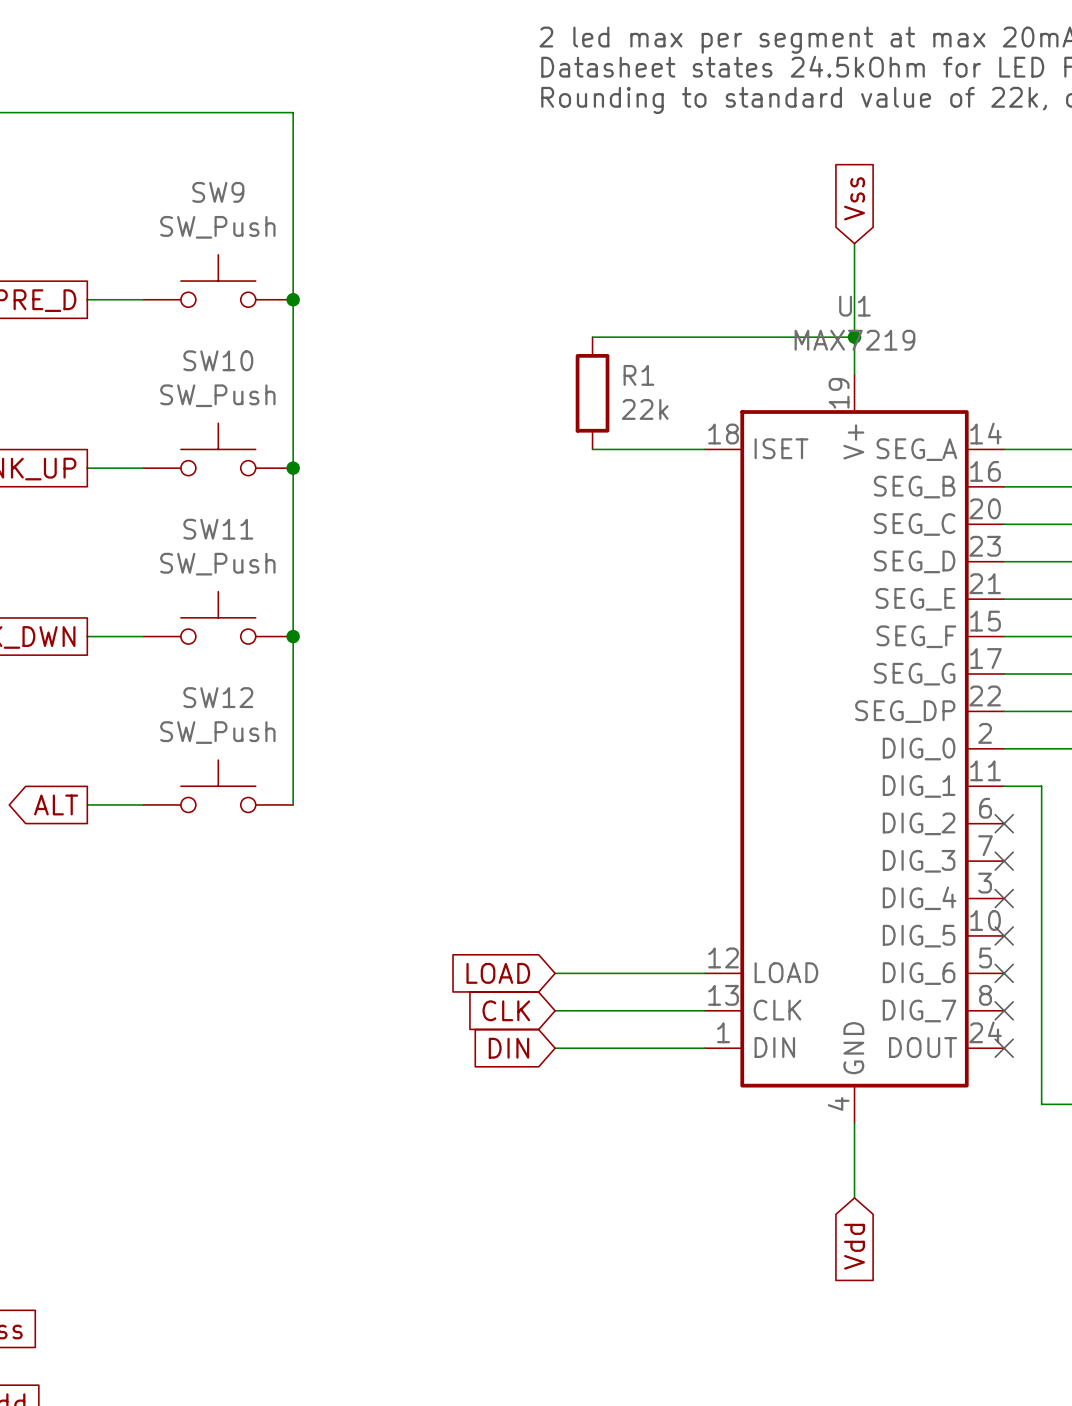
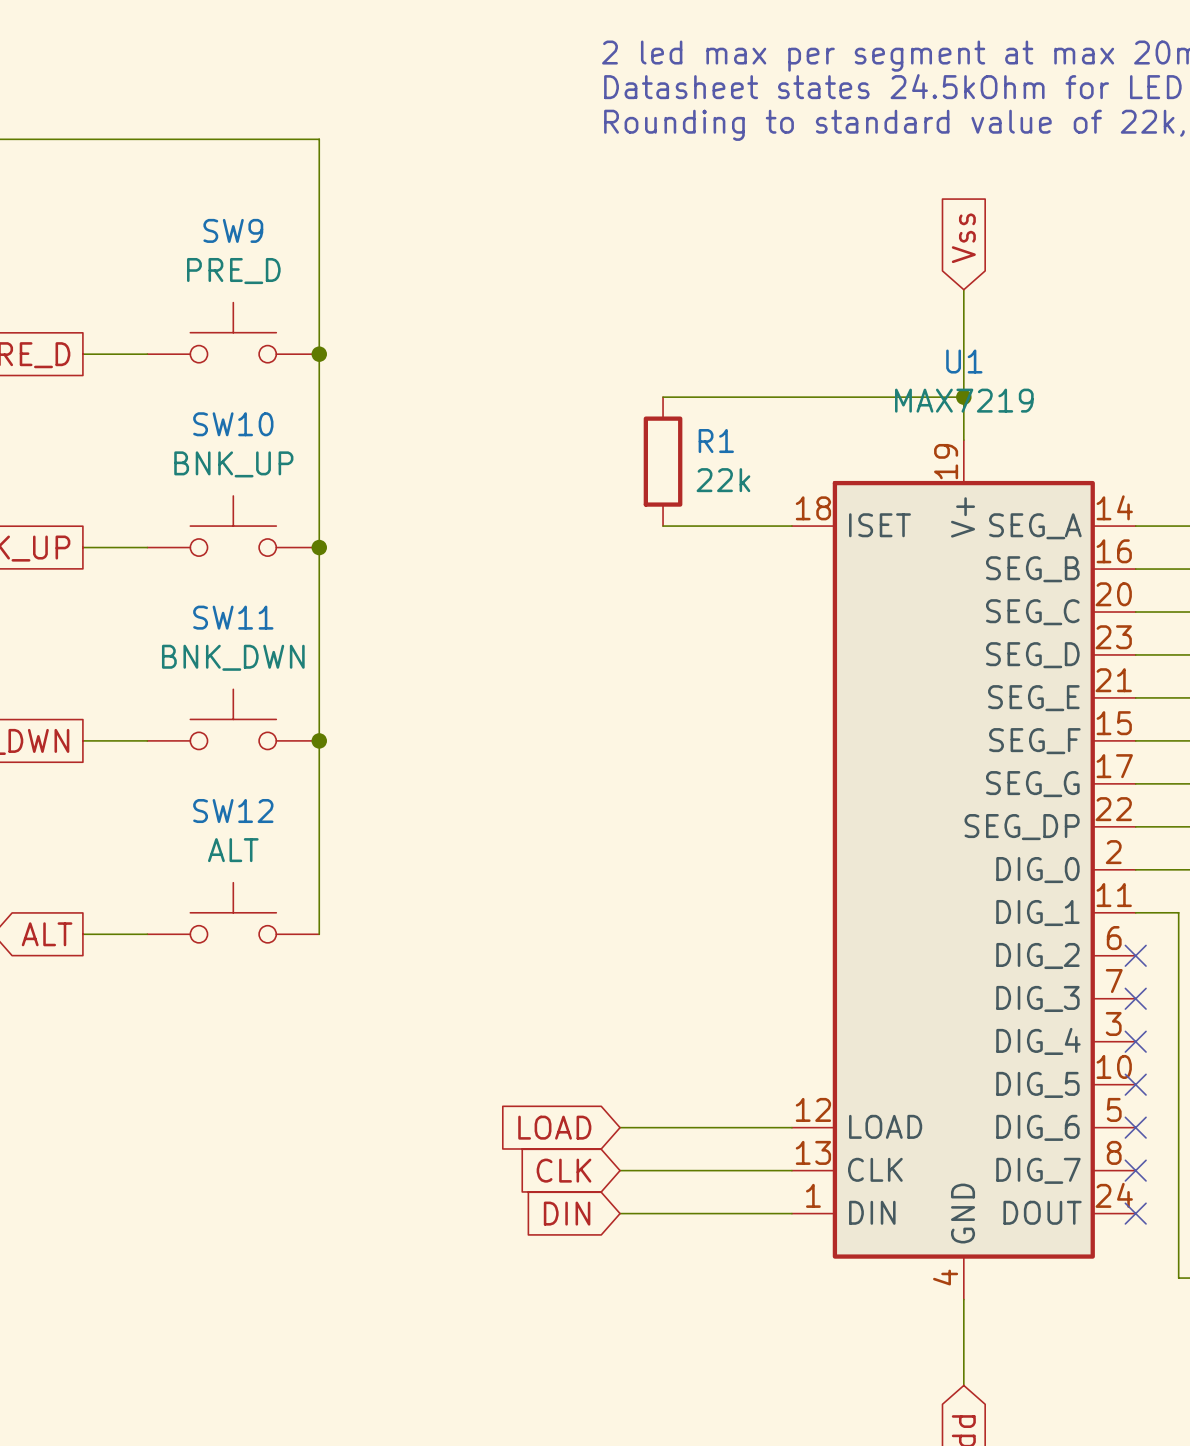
SW9 value: SW_Push (217, 227) -> PRE_D (233, 271)
SW10 value: SW_Push (217, 395) -> BNK_UP (233, 464)
SW11 value: SW_Push (217, 564) -> BNK_DWN (233, 657)
SW12 value: SW_Push (217, 732) -> ALT (233, 850)

